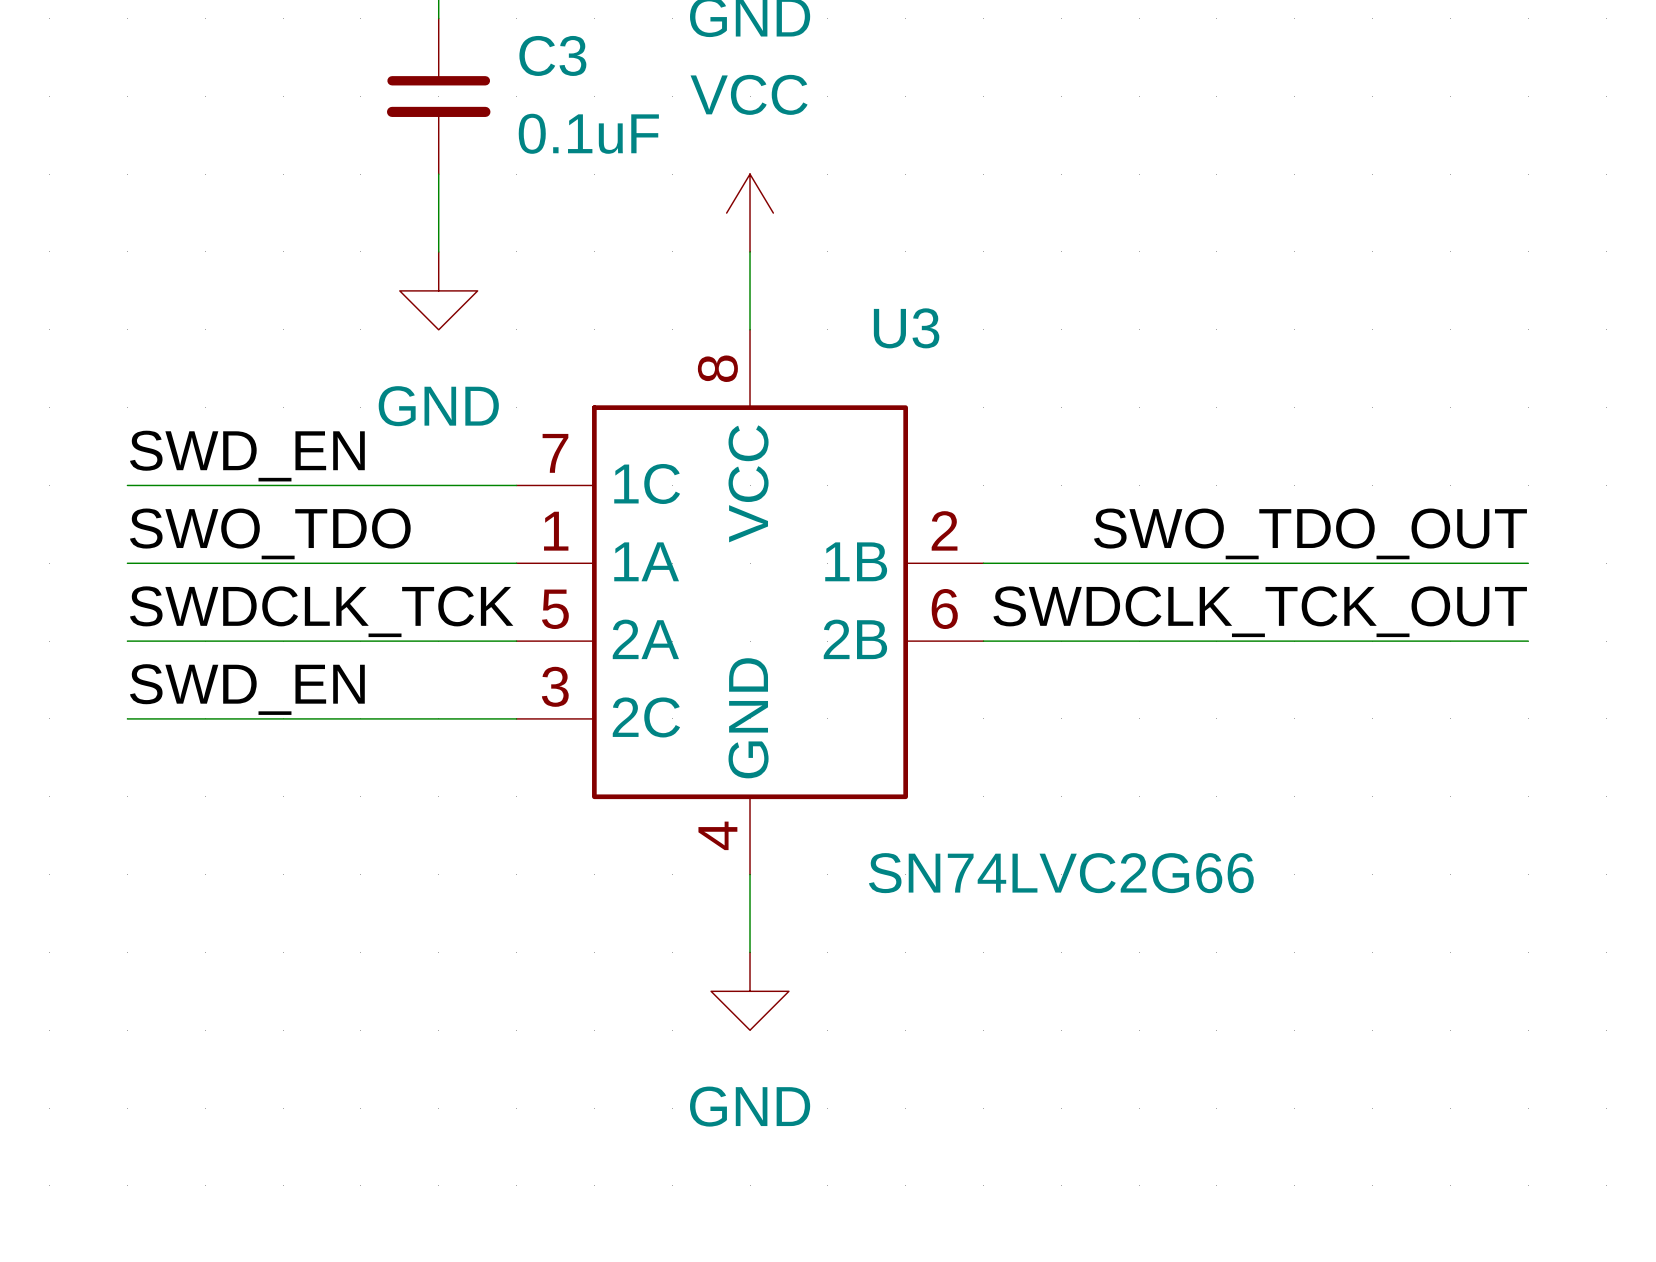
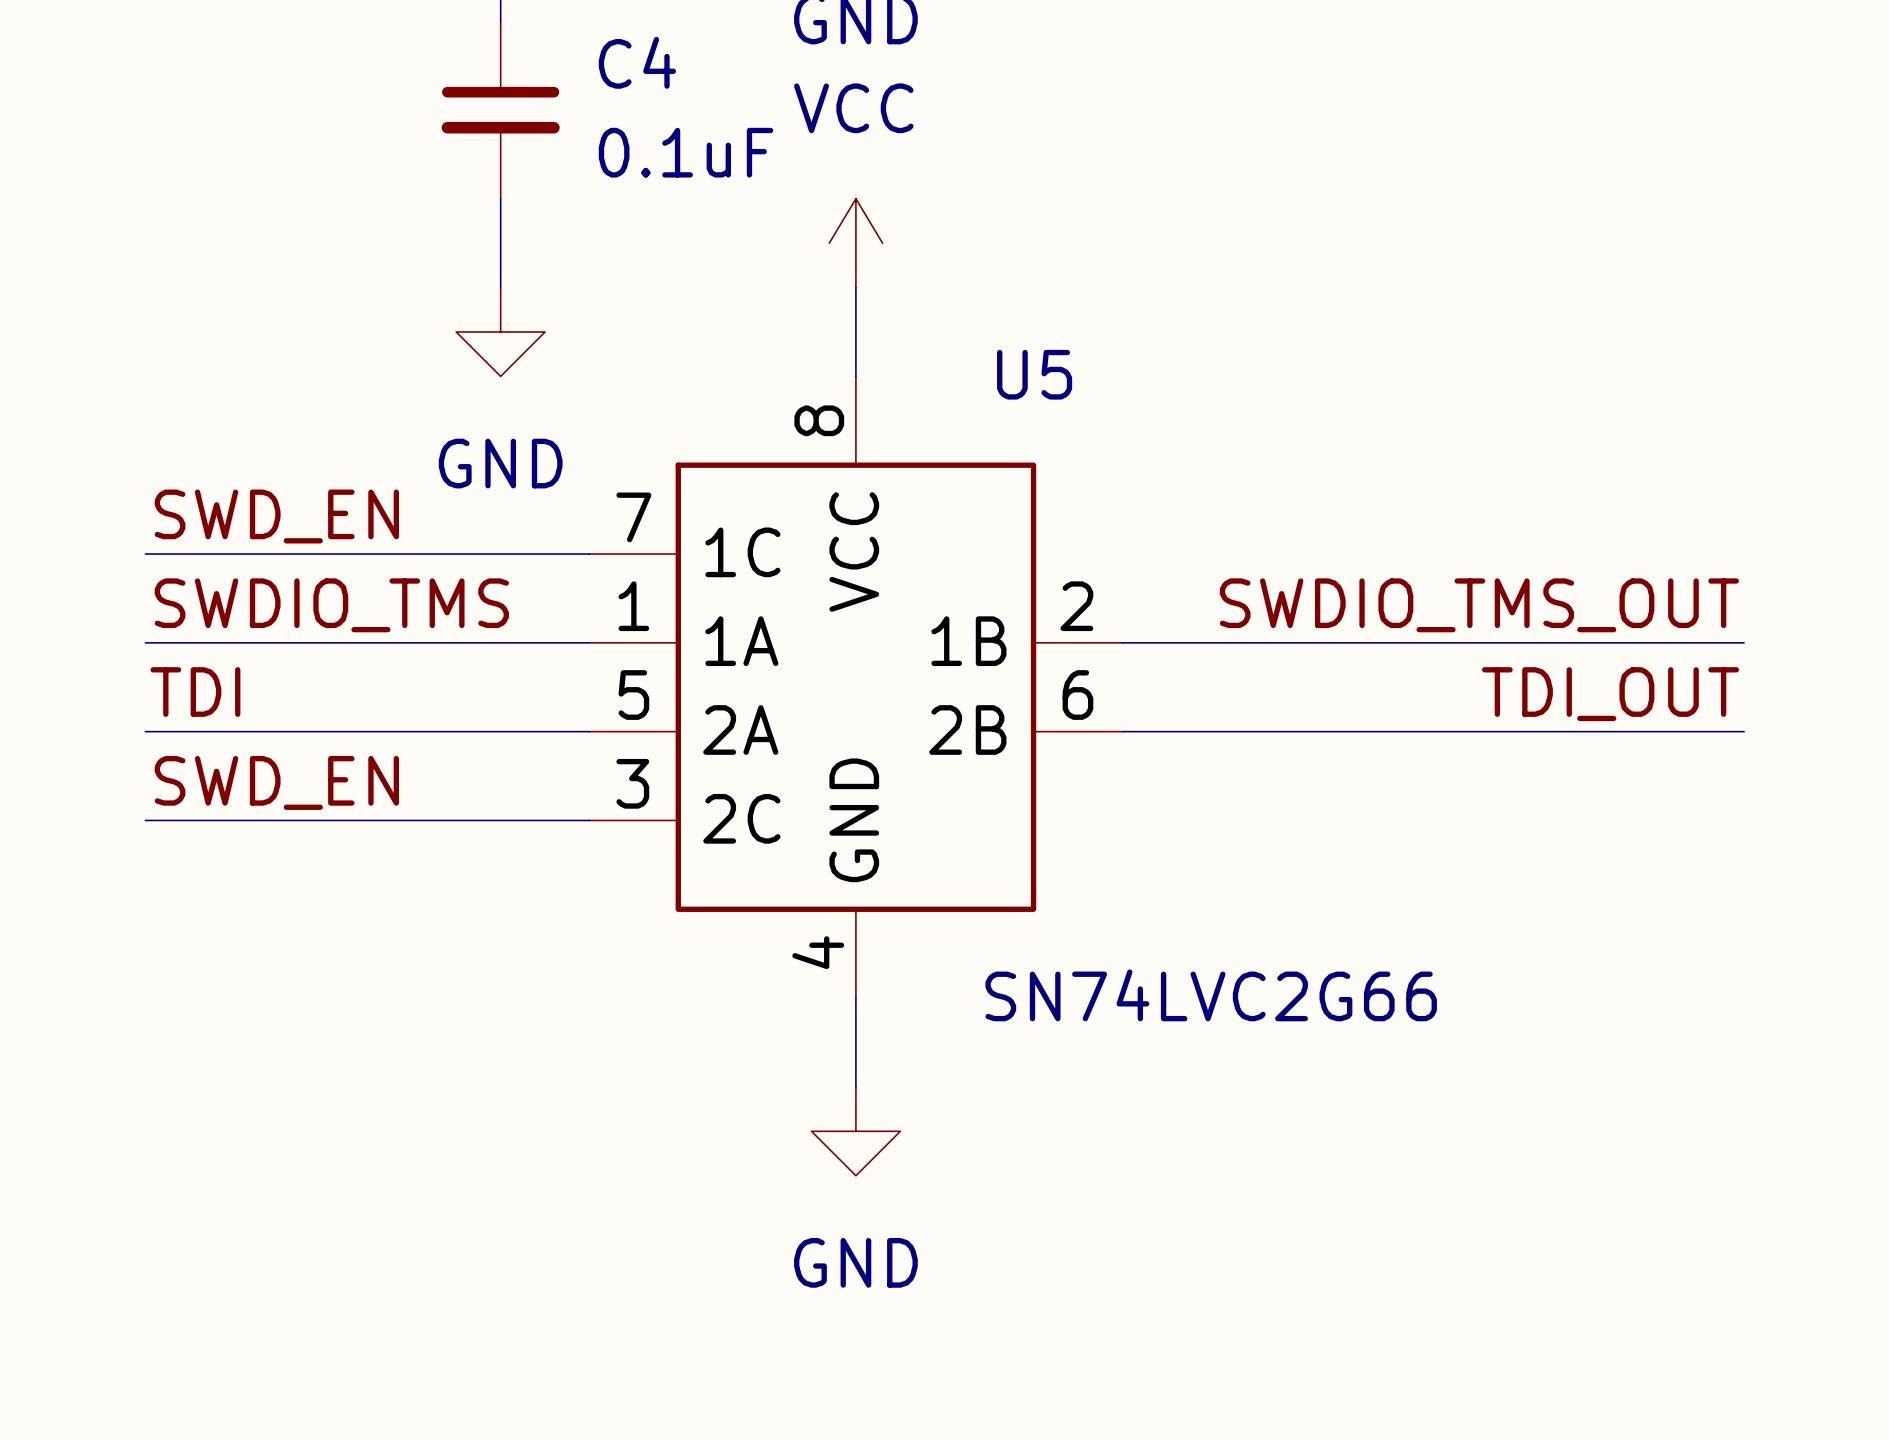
C3 name: C3 (552, 55) -> C4 (637, 62)
U3 name: U3 (906, 328) -> U5 (1034, 374)
label: SWO_TDO (270, 533) -> SWDIO_TMS (331, 605)
label: SWO_TDO_OUT (1310, 533) -> SWDIO_TMS_OUT (1479, 605)
label: SWDCLK_TCK (321, 611) -> TDI (195, 692)
label: SWDCLK_TCK_OUT (1260, 611) -> TDI_OUT (1610, 694)

